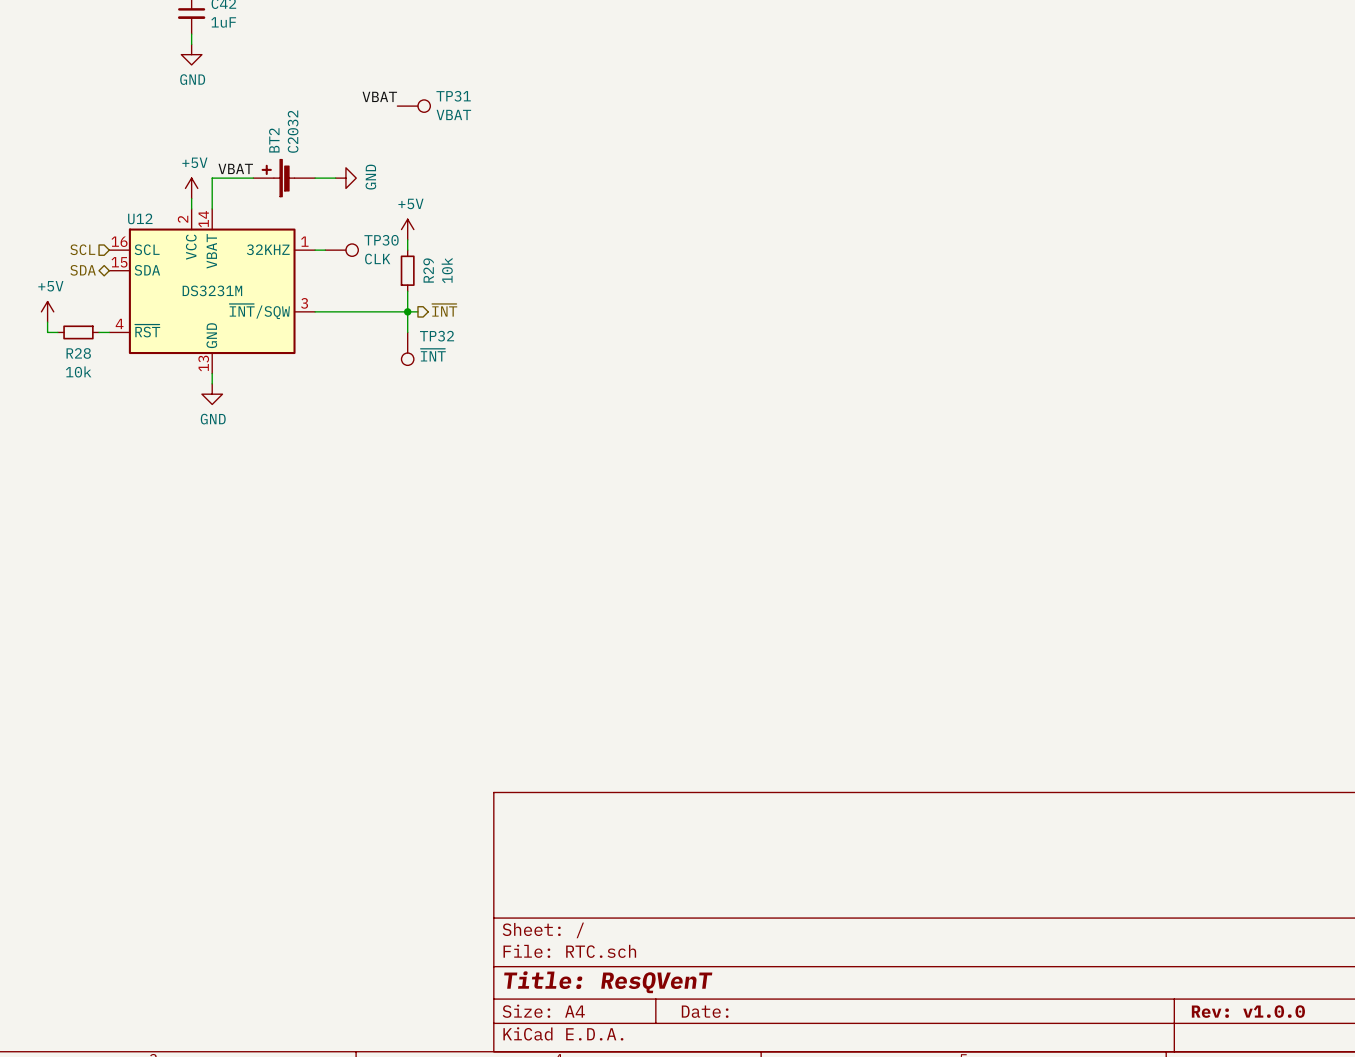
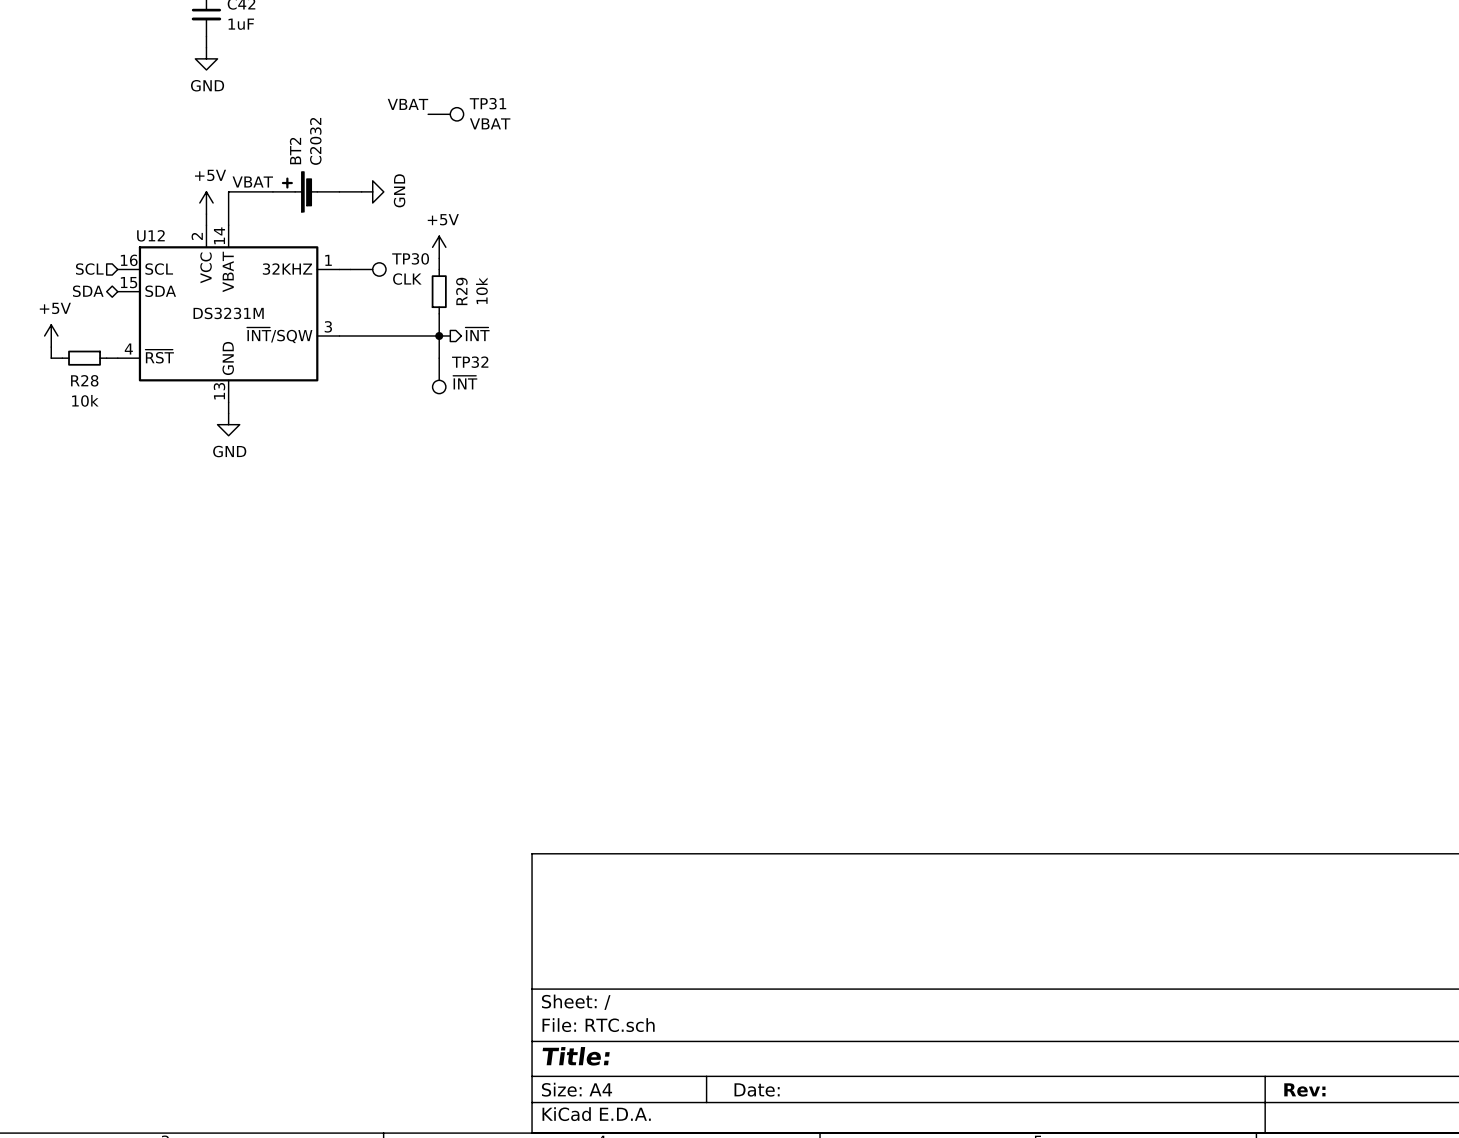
title block: Title: ResQVenT (608, 982) -> Title: (576, 1056)
title block: Rev: v1.0.0 (1248, 1011) -> Rev: (1304, 1089)

